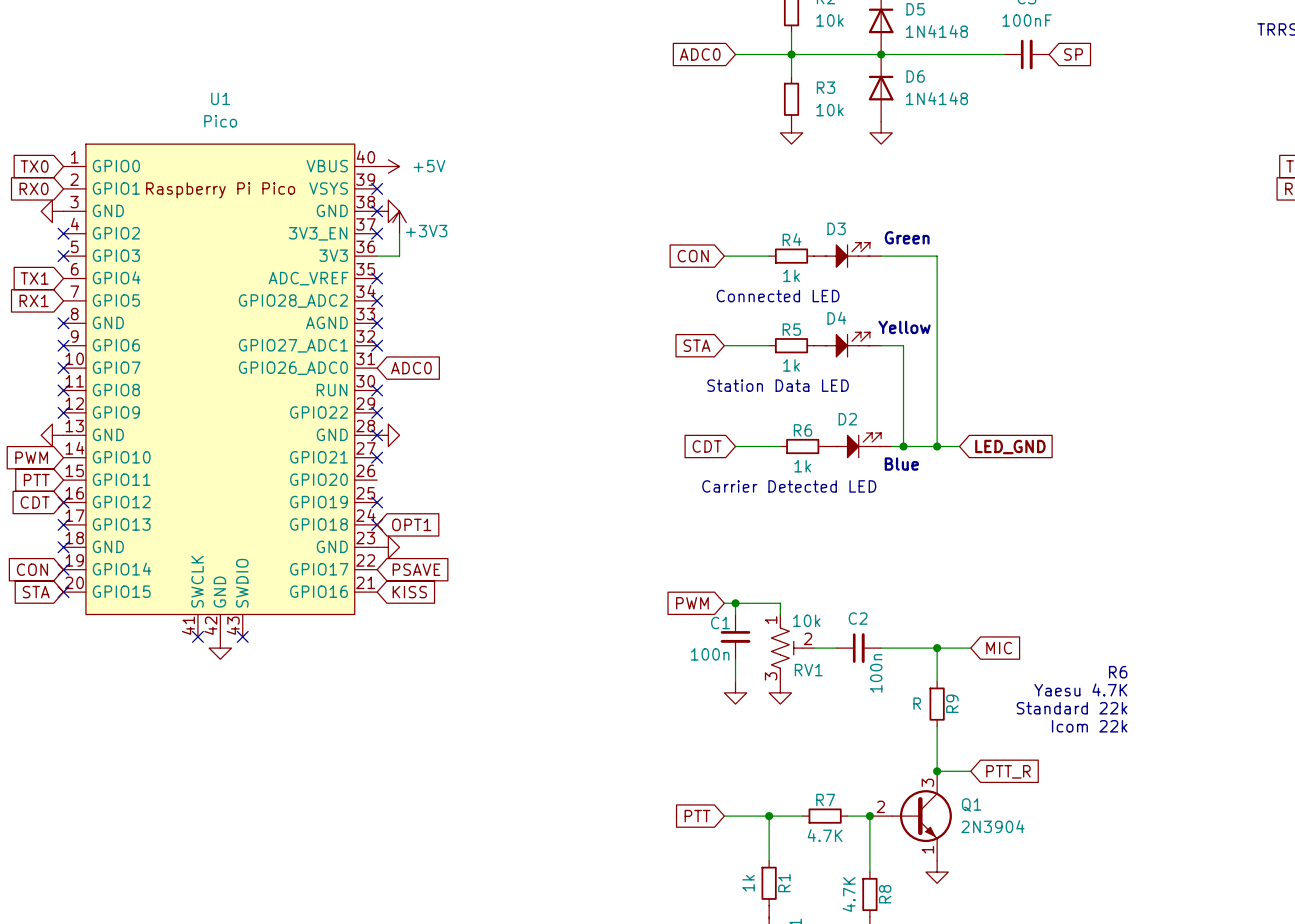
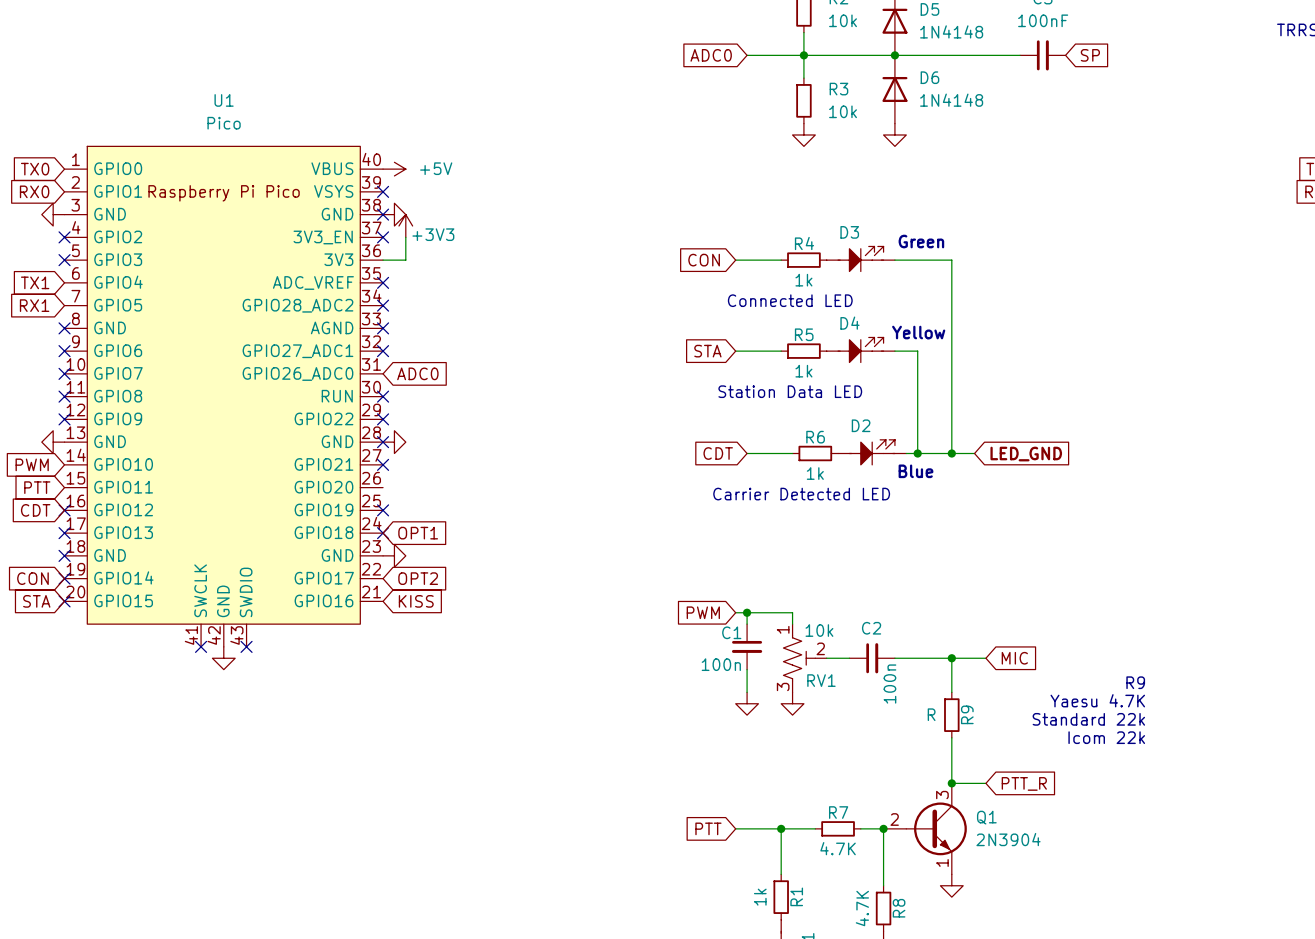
global label: PSAVE (416, 569) -> OPT2 (418, 578)
text: R6 (1118, 672) -> R9 (1135, 682)

